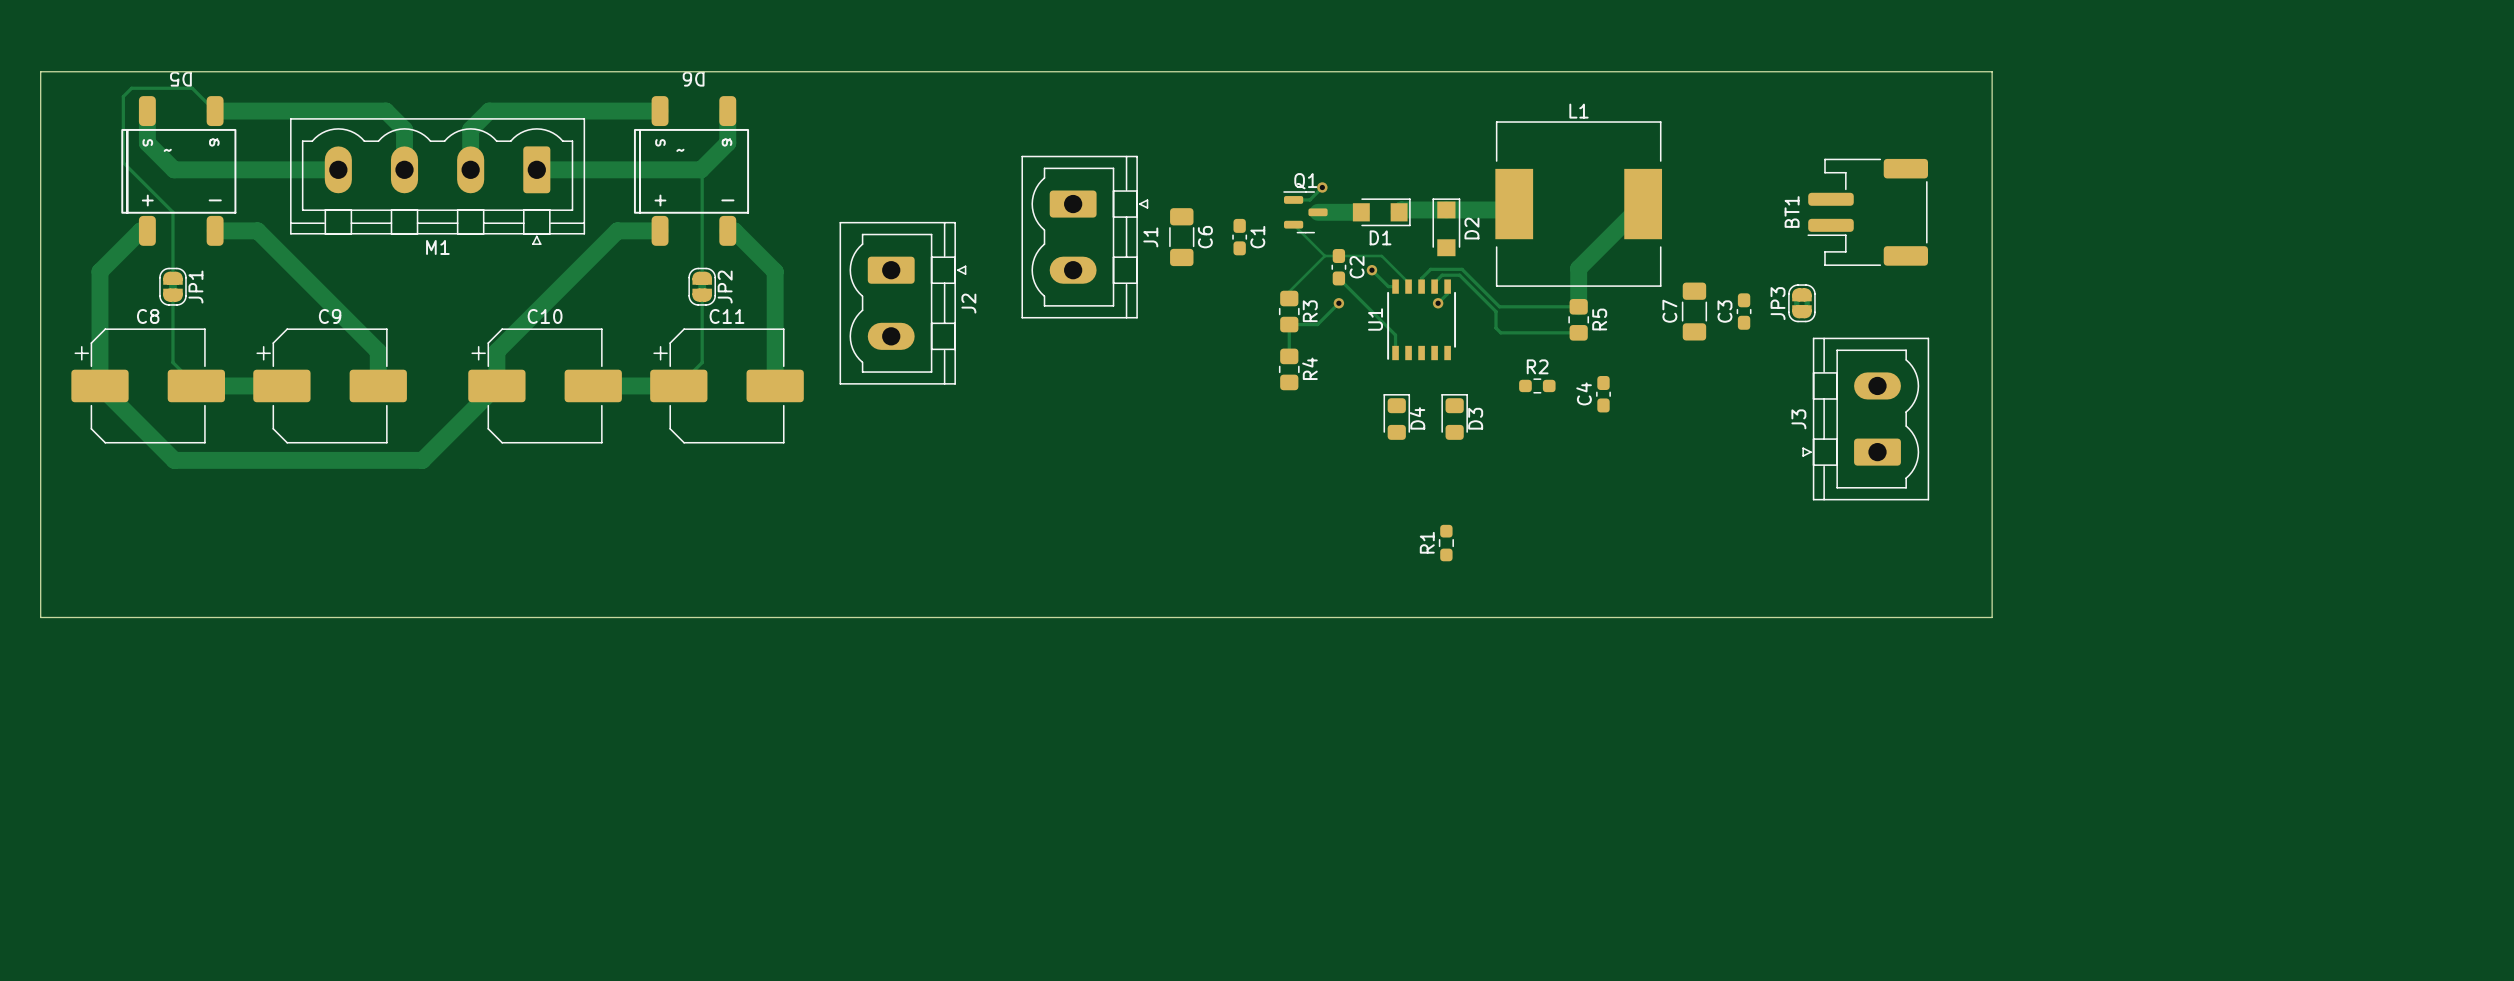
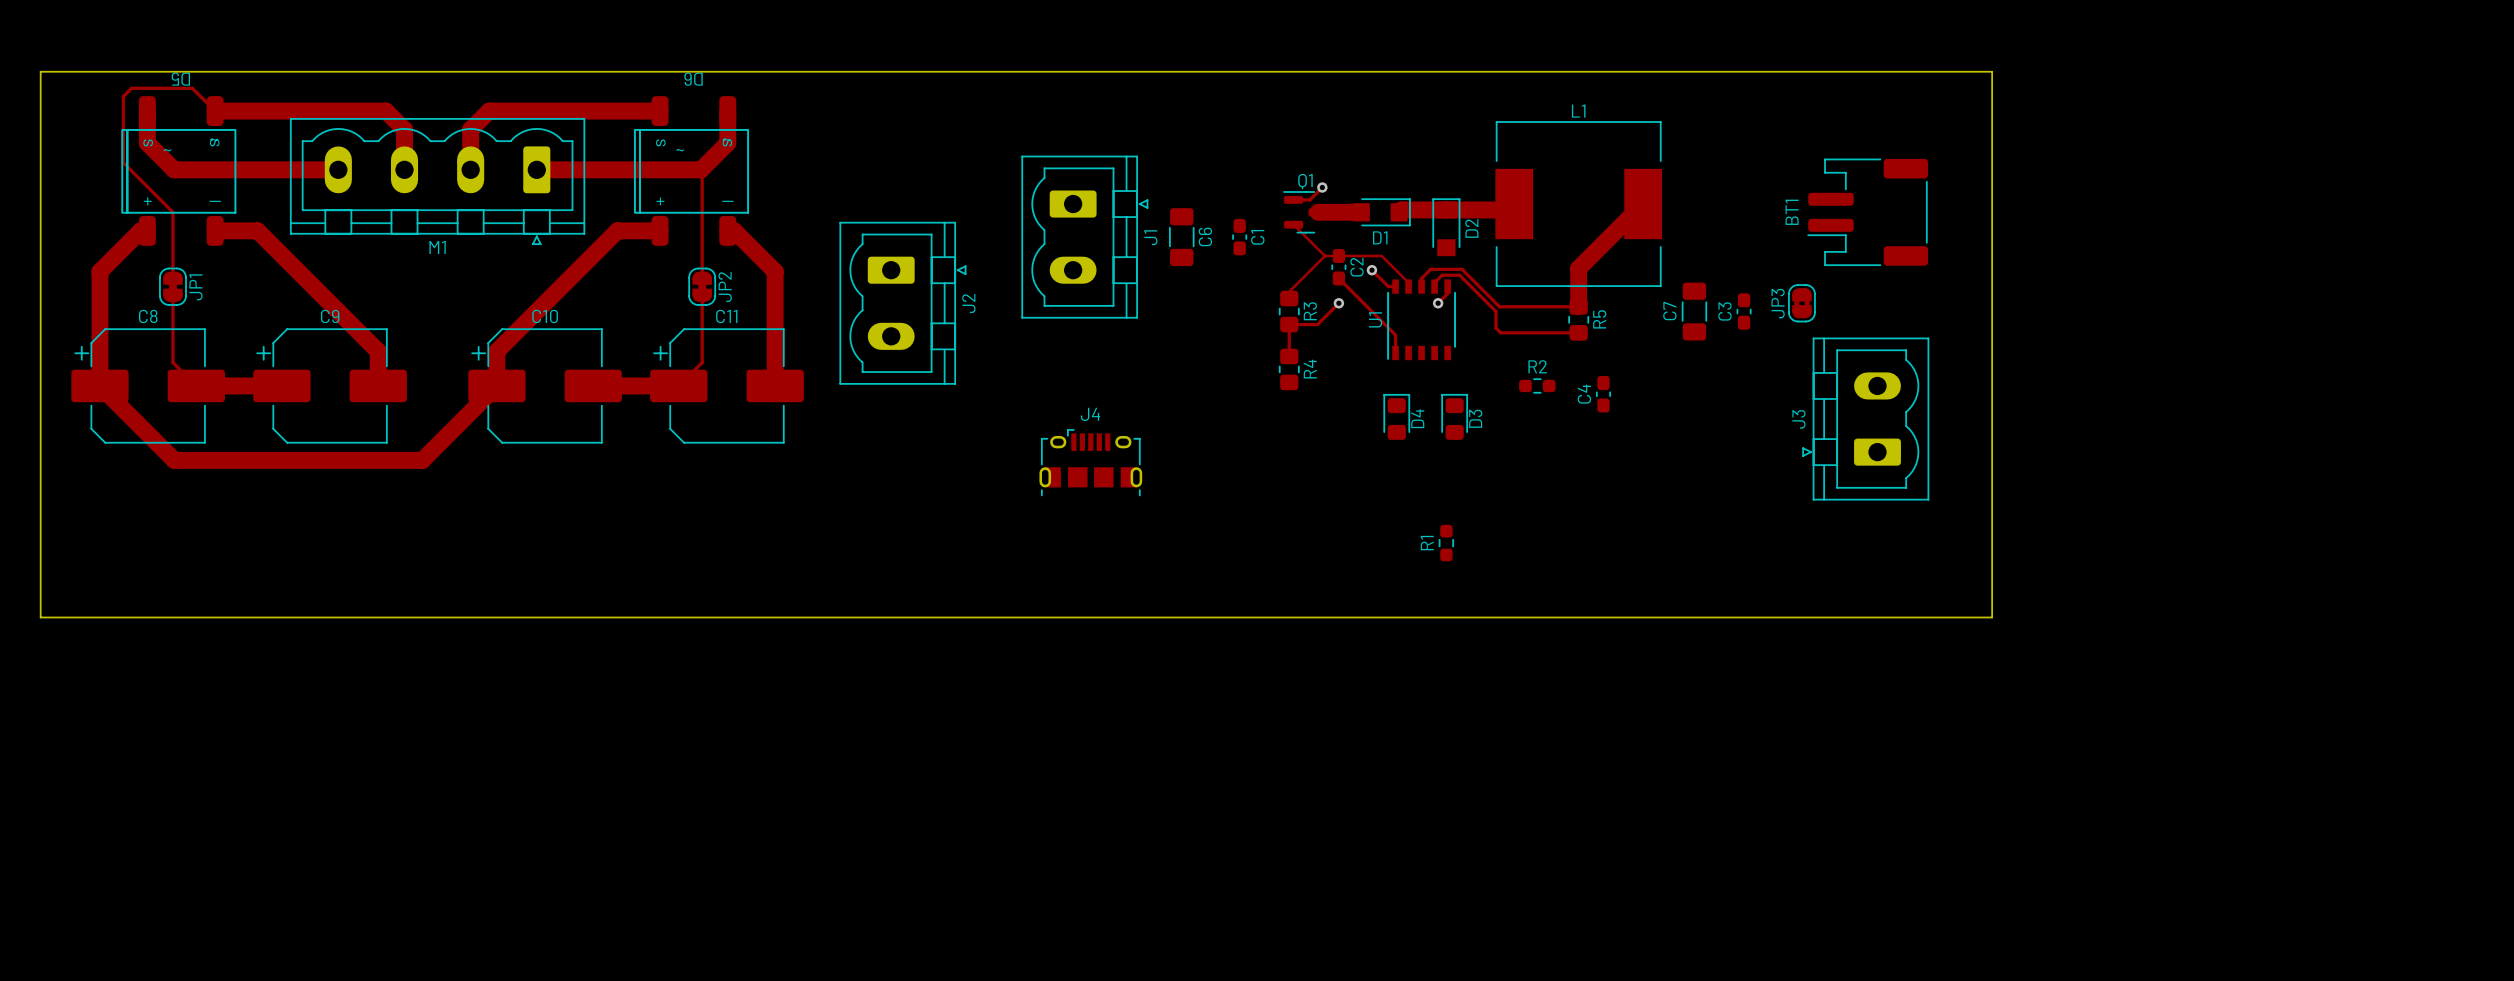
J4: none -> (1090, 462)

